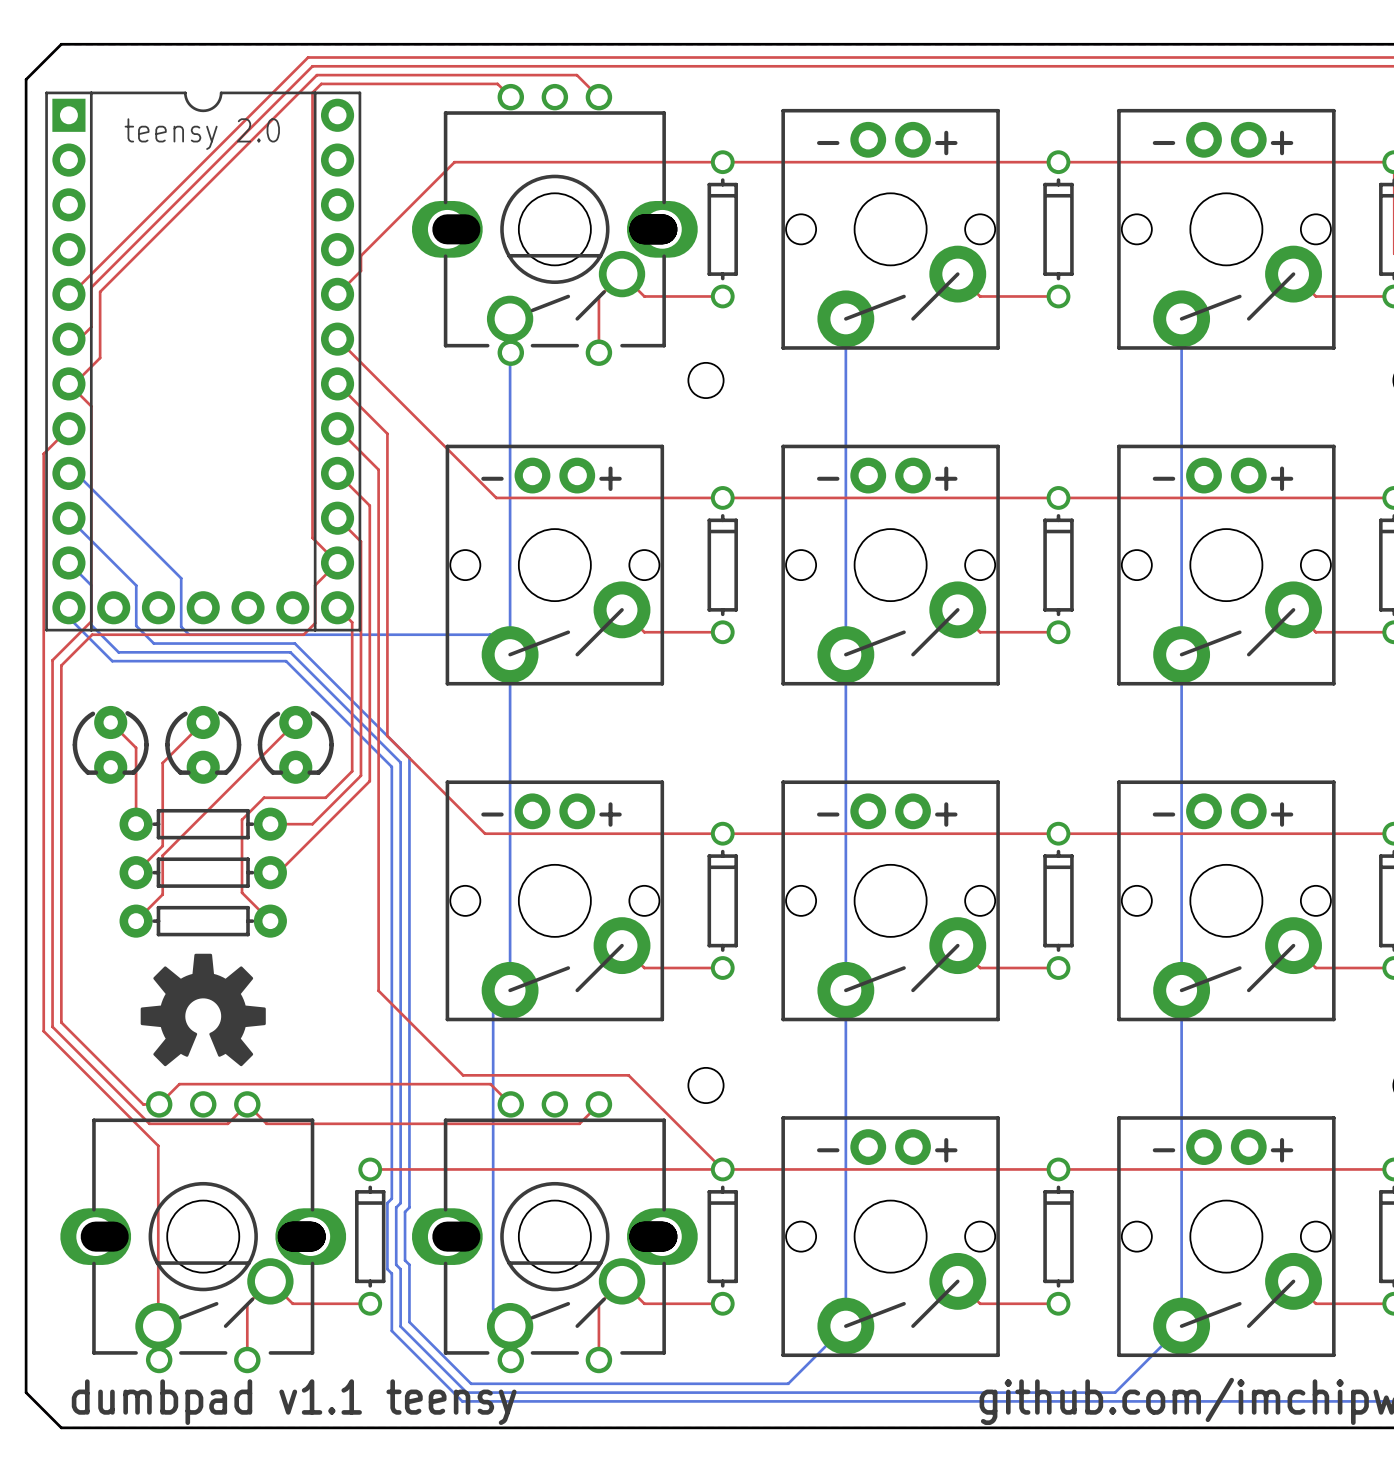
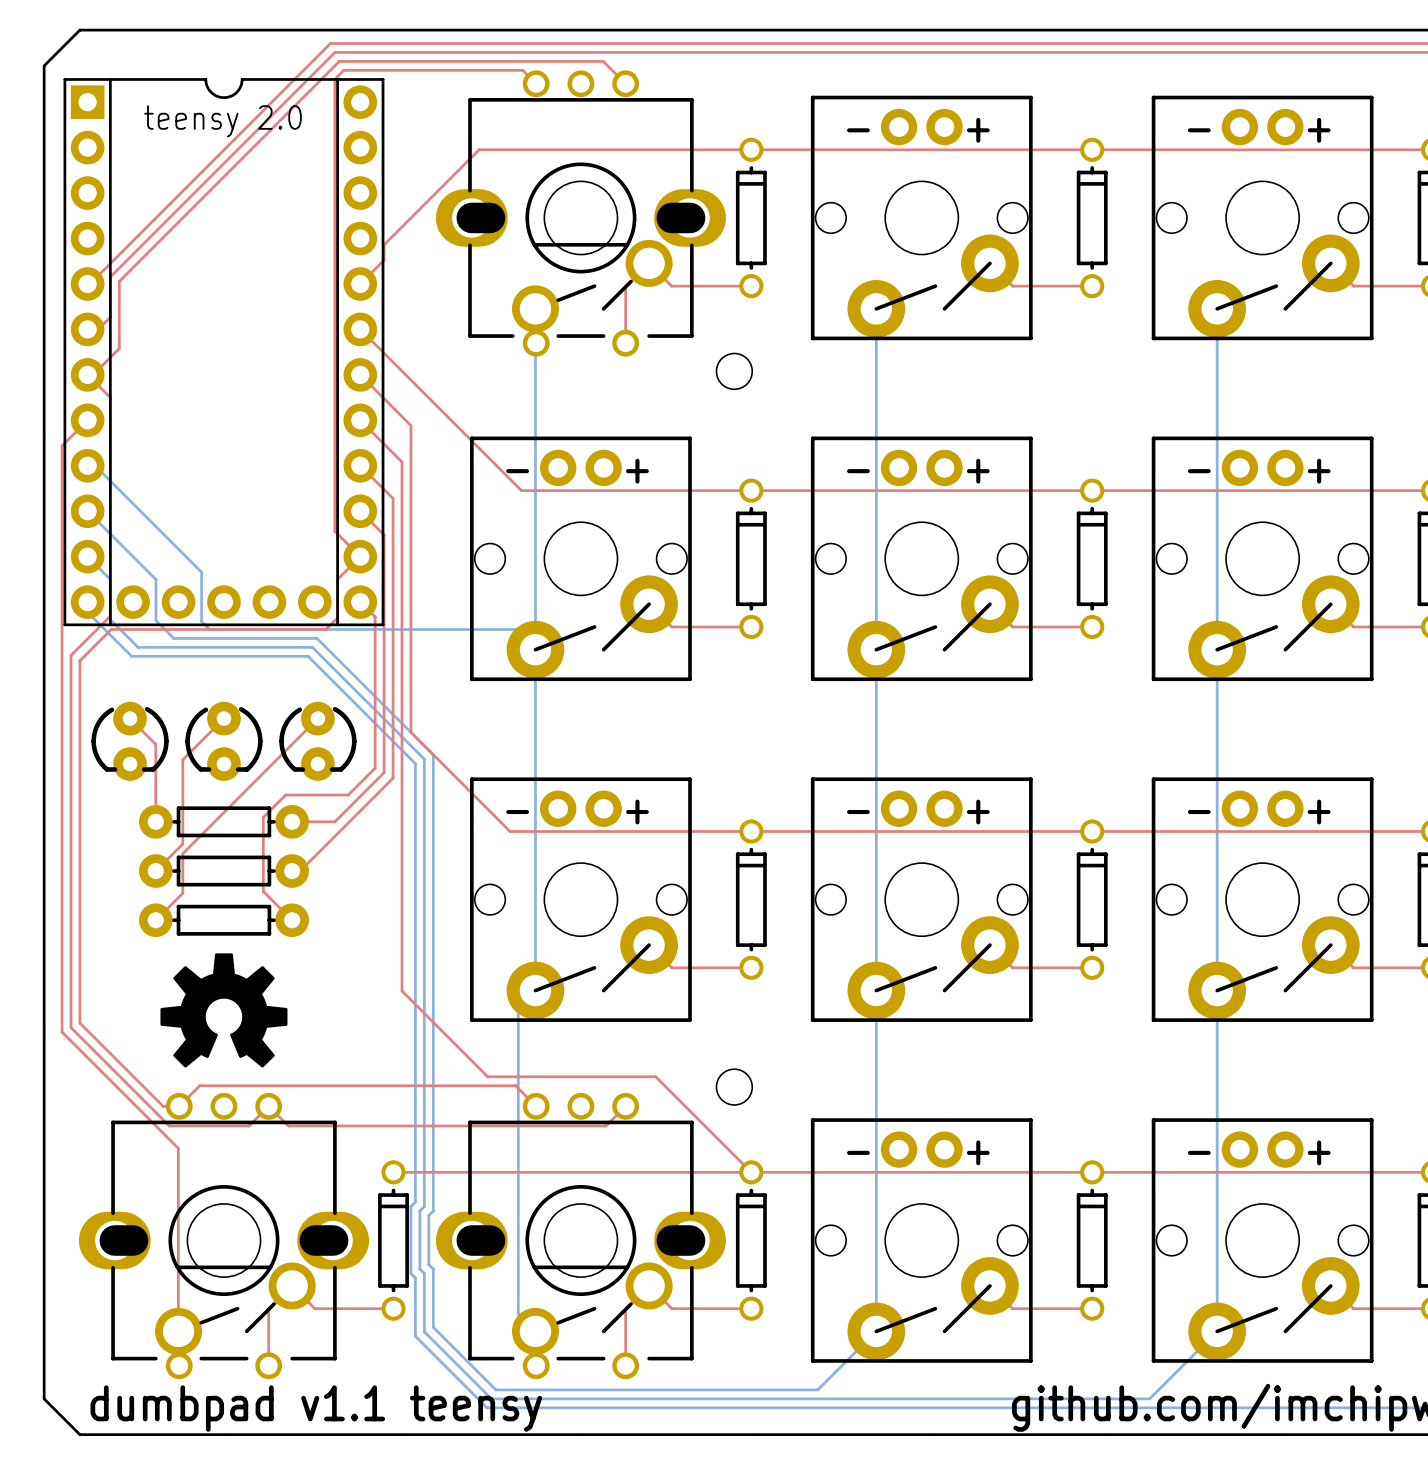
part footprint: [411, 83, 698, 366] -> [435, 70, 727, 357]
part footprint: [60, 1091, 347, 1374] -> [78, 1092, 370, 1380]
part footprint: [411, 1091, 698, 1374] -> [435, 1092, 727, 1380]

